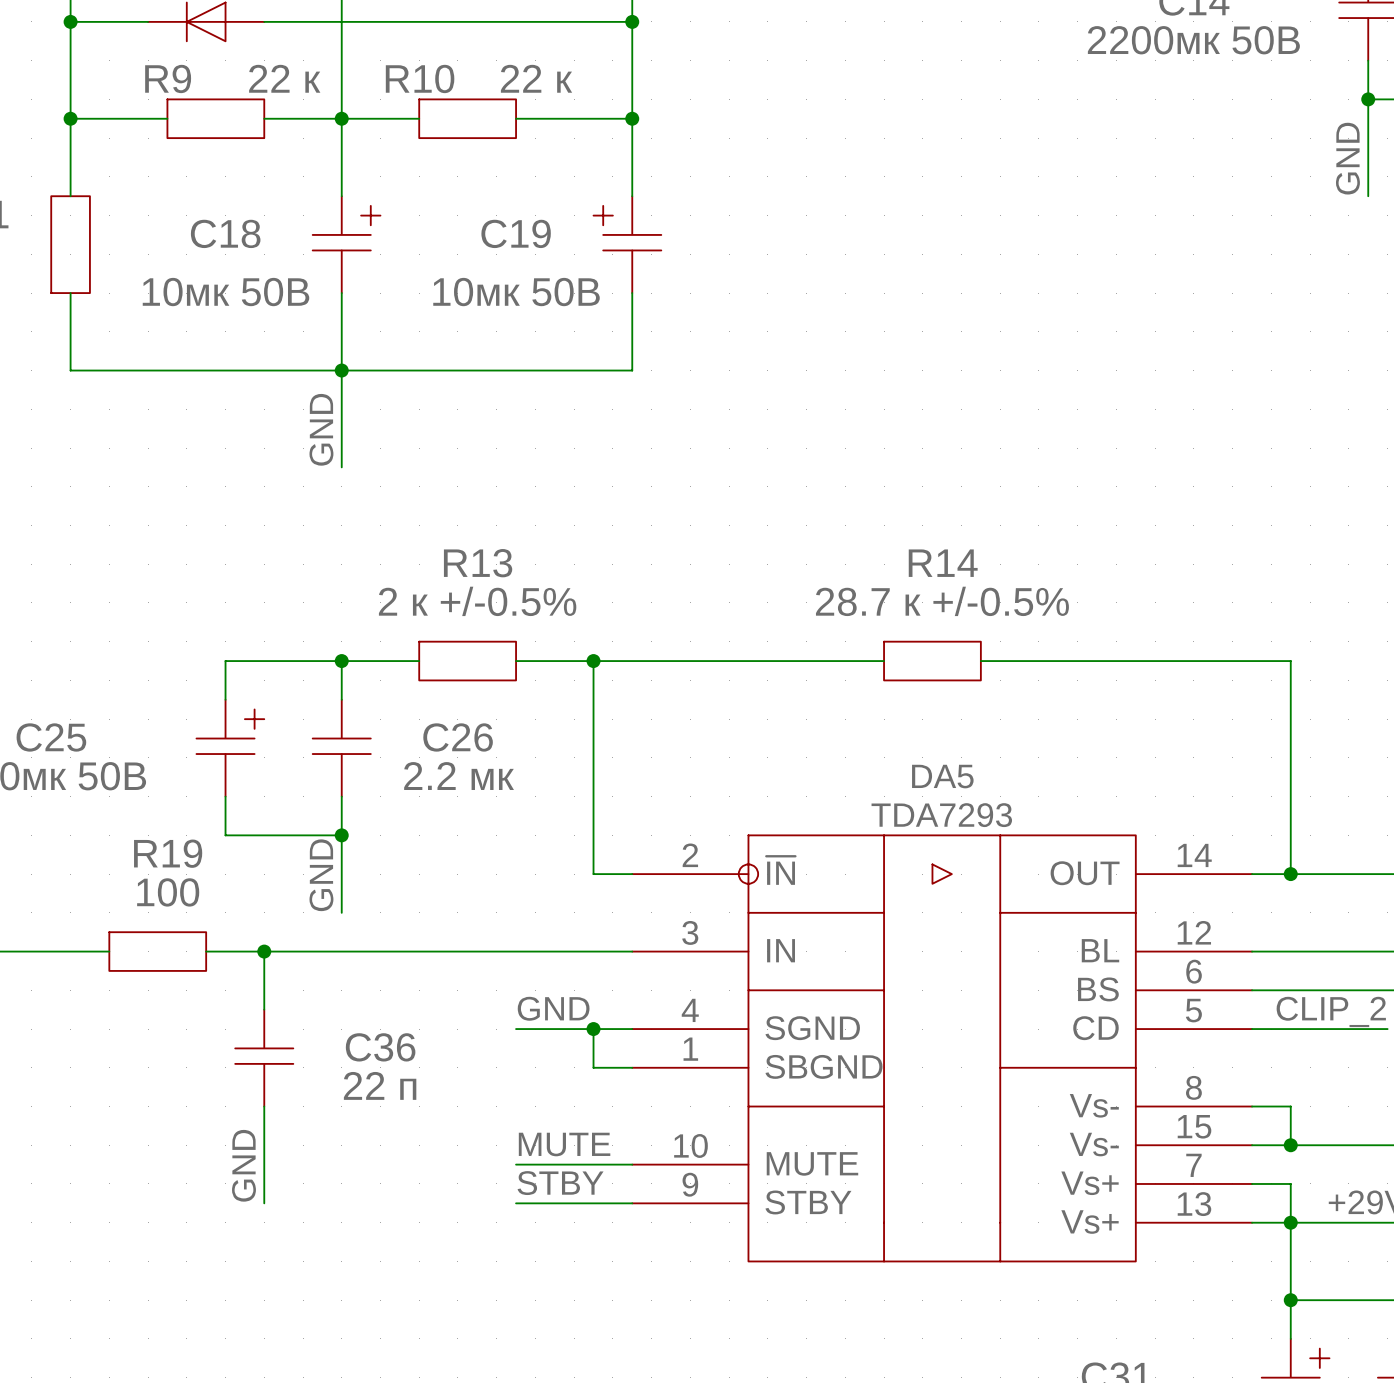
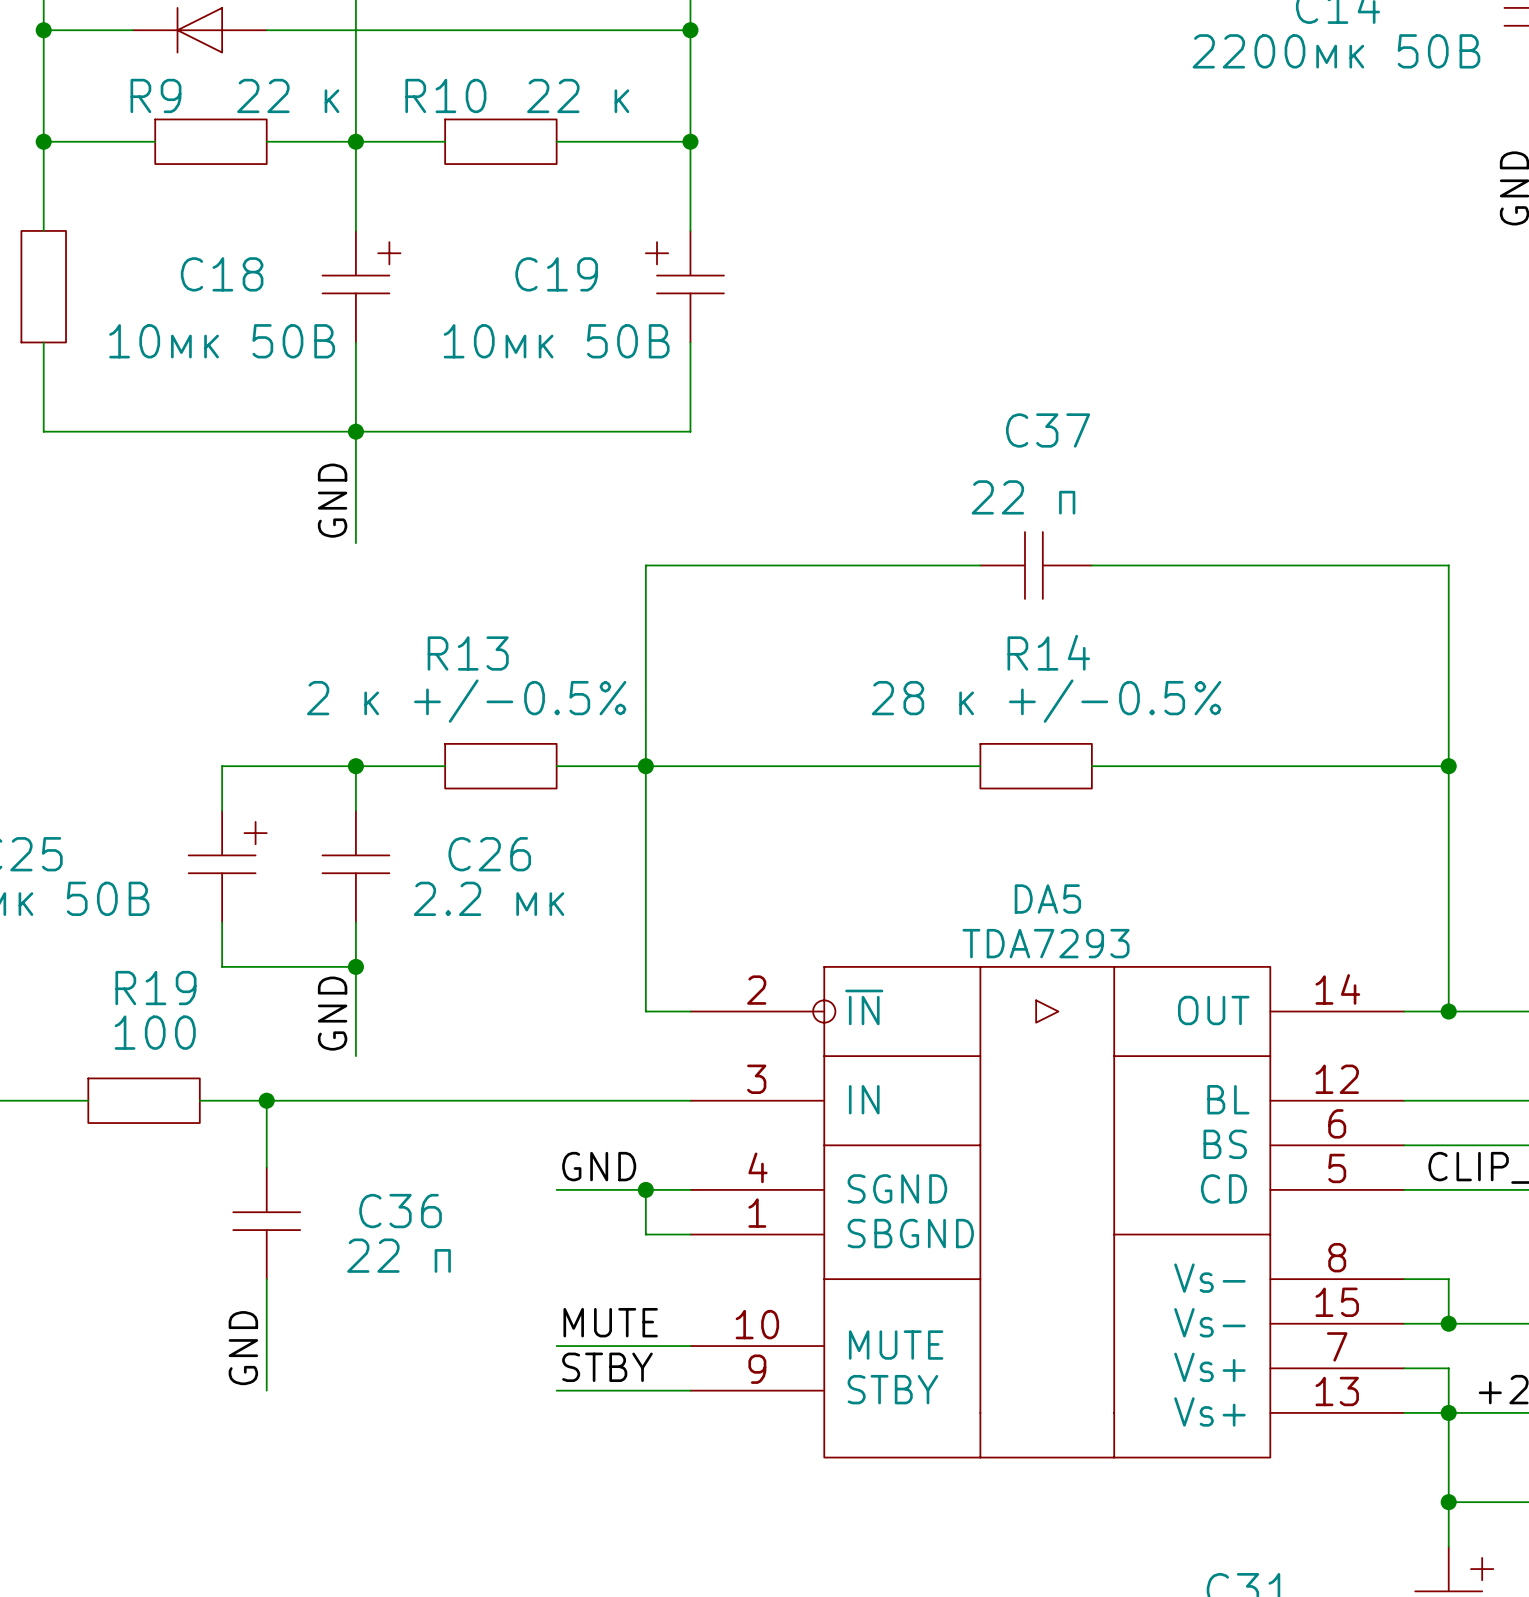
wire: none -> (980, 565) (645, 565) (645, 766)
C37: none -> 22 п (1036, 565)
wire: none -> (1091, 565) (1448, 565) (1448, 766)
R13 name position: R13 (478, 563) -> R13 (468, 653)
R13 value position: 2 к +/-0.5% (477, 601) -> 2 к +/-0.5% (466, 701)
R14 value: 28.7 к +/-0.5% (942, 601) -> 28 к +/-0.5% (1046, 701)
junction: none -> (1448, 766)

